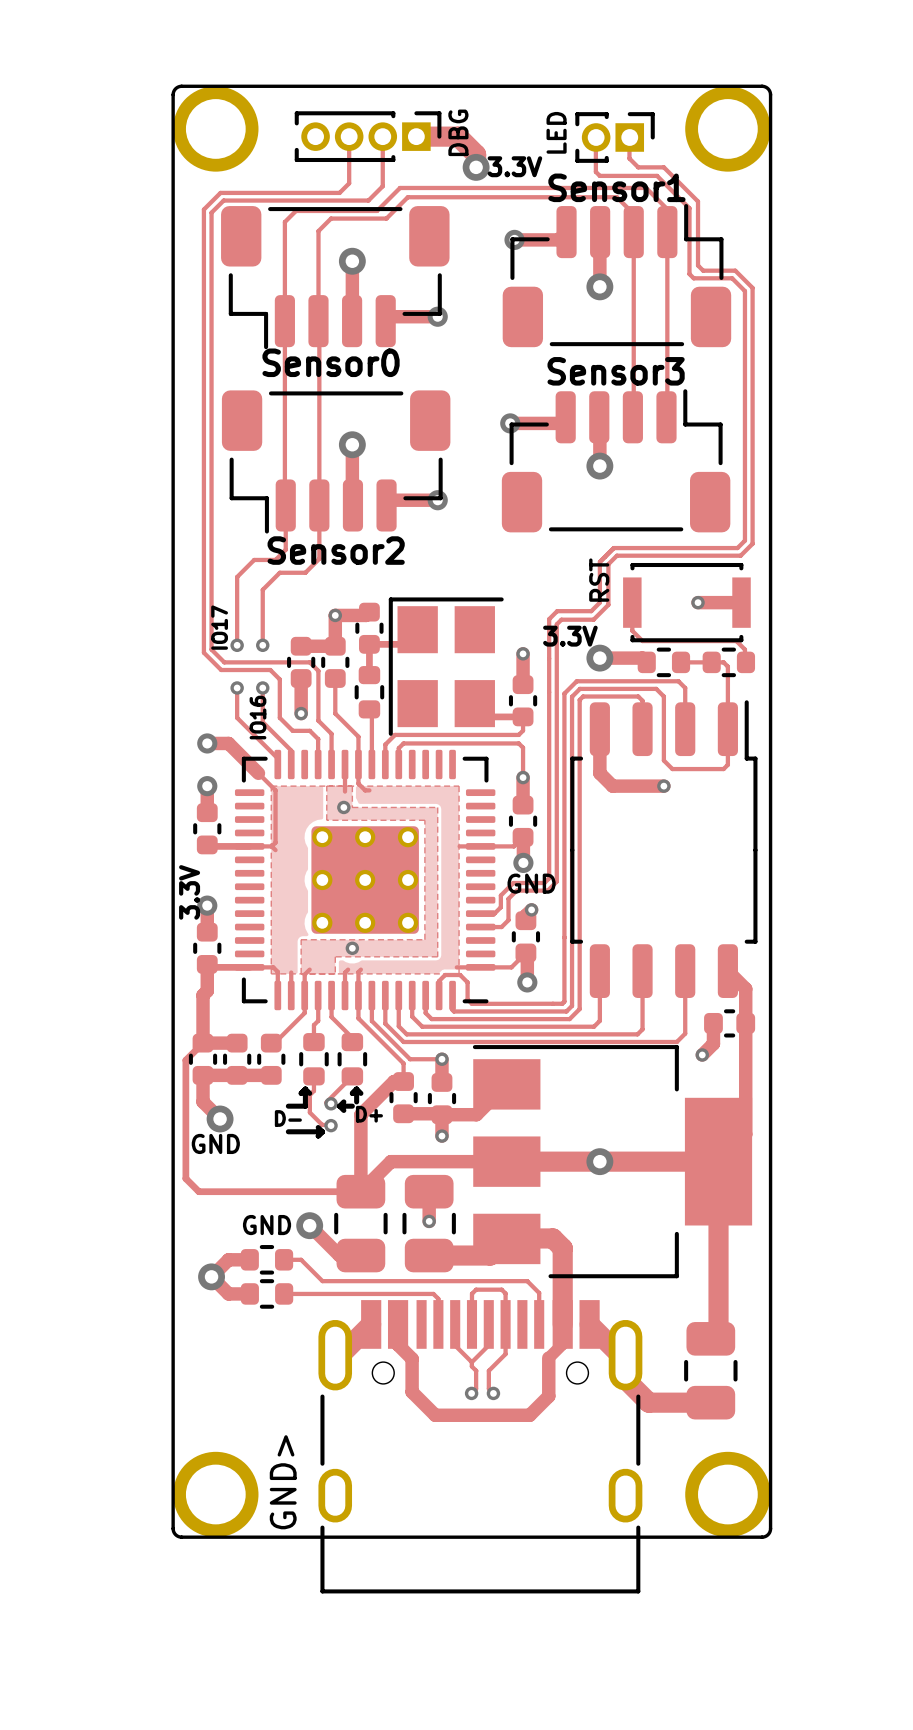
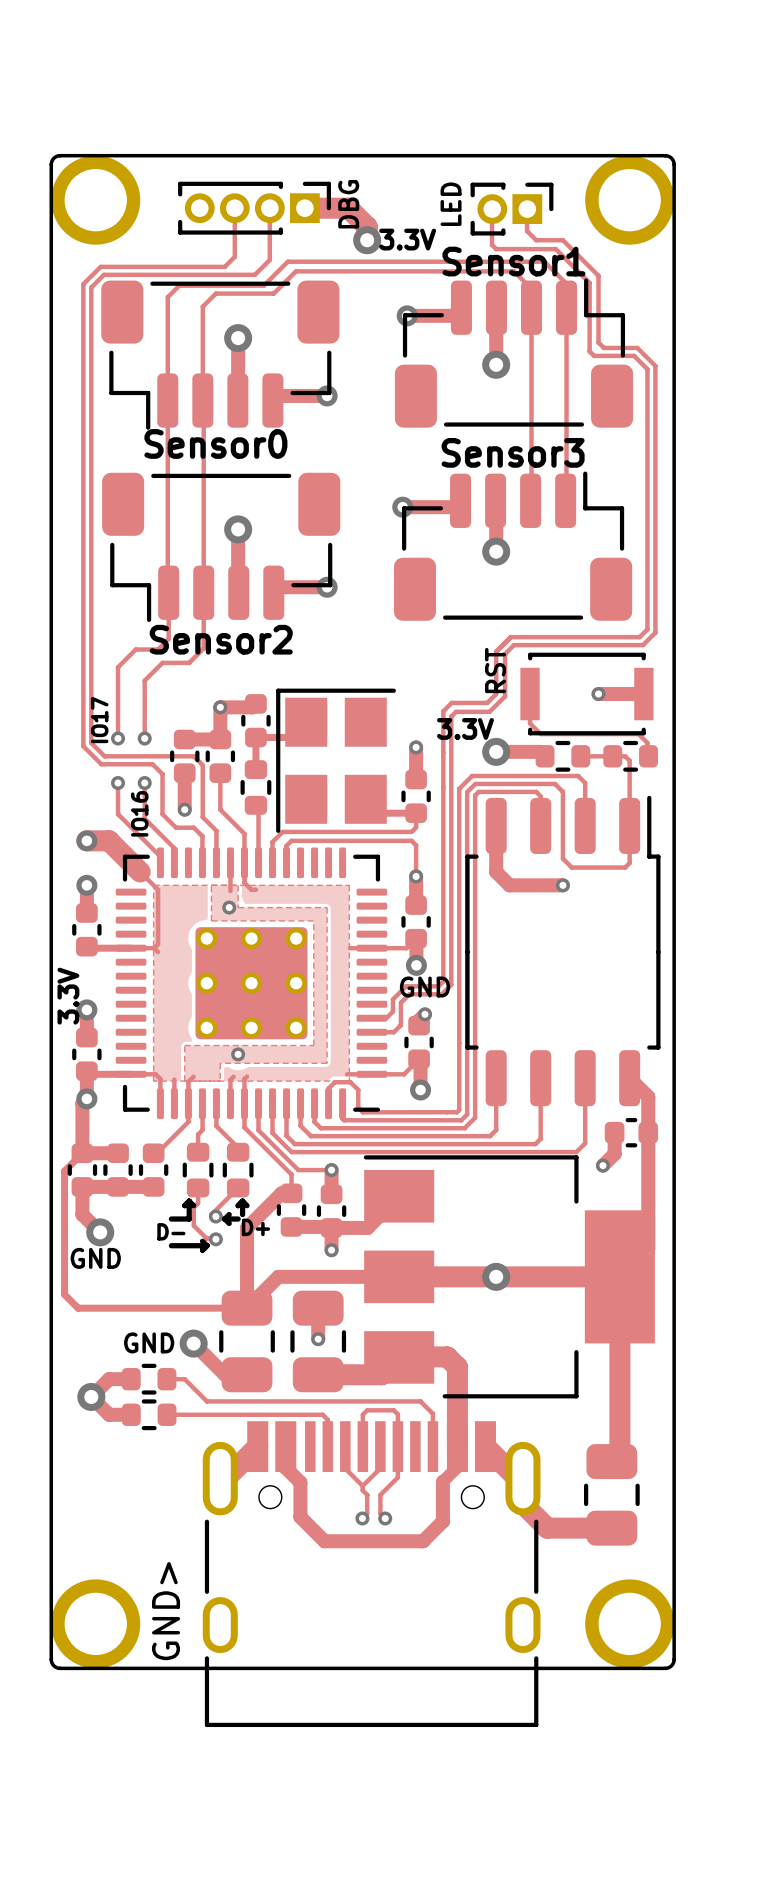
track width: thin (207, 743) (228, 743) (258, 773) -> thick (86, 840) (109, 840) (140, 871)
via: none -> (86, 1098)

